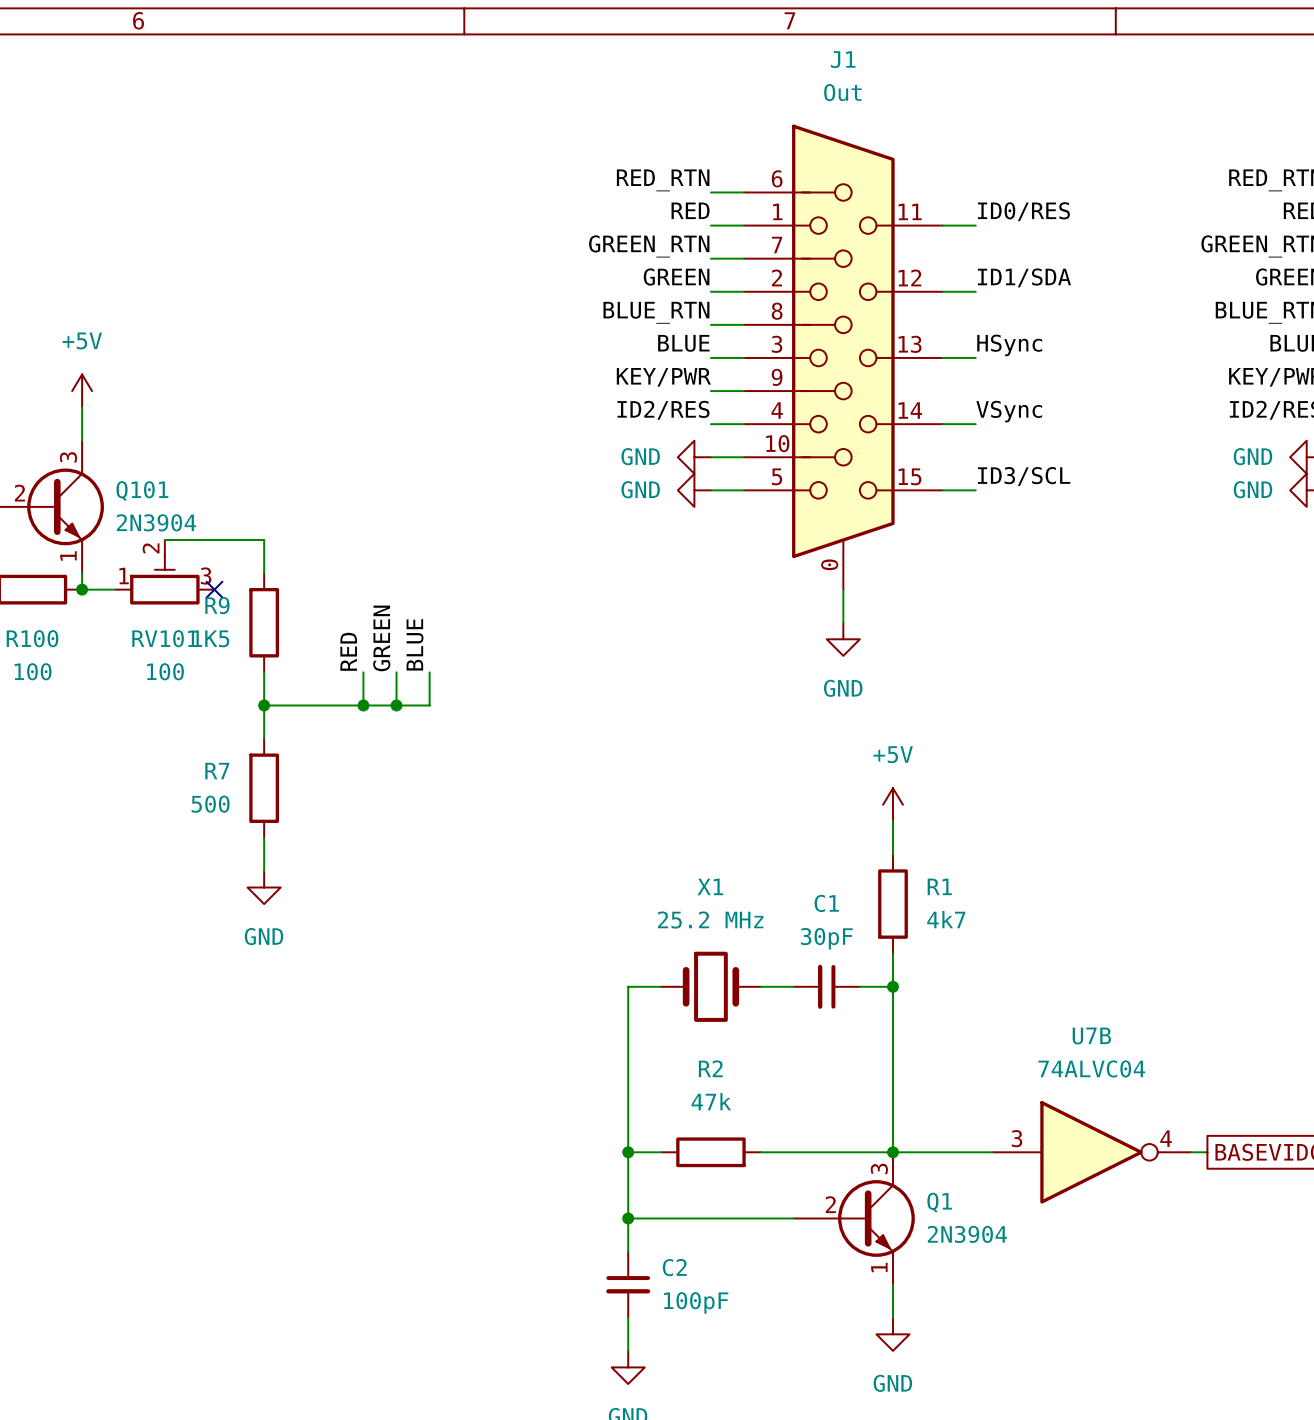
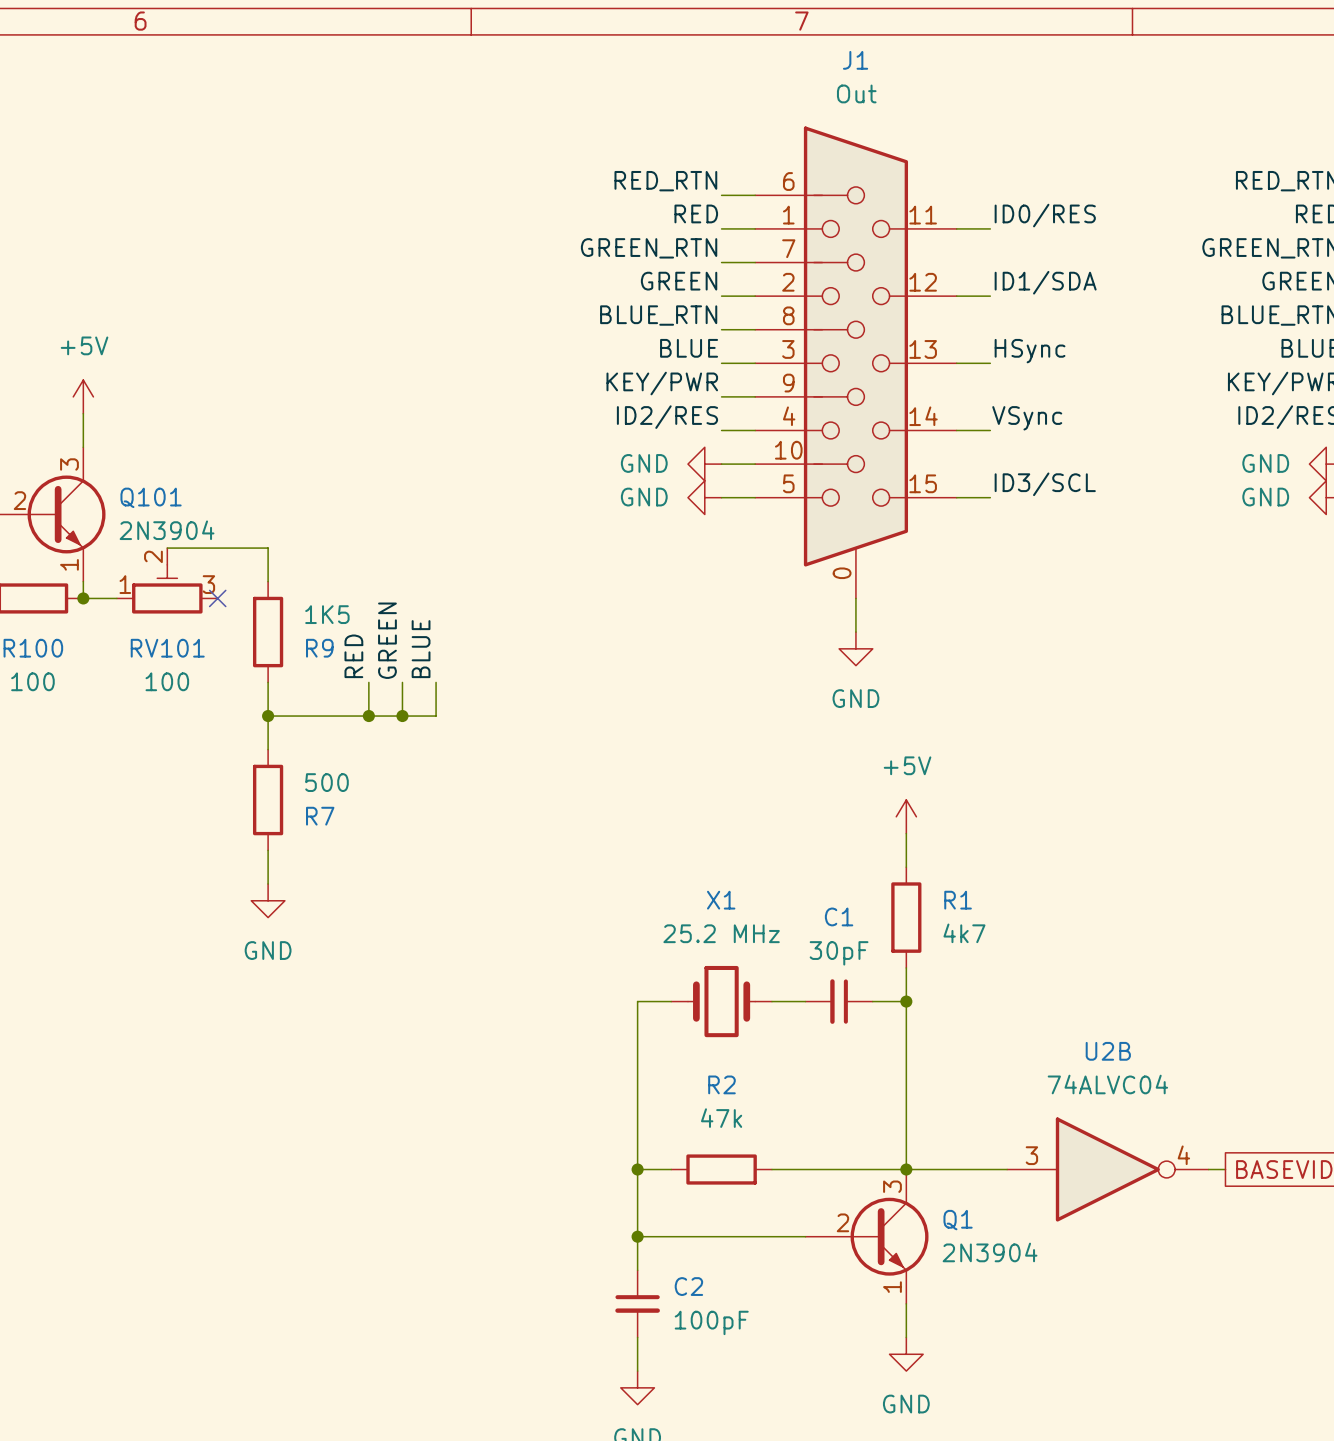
R9 name position: R9 (217, 605) -> R9 (319, 648)
R9 value position: 1K5 (211, 638) -> 1K5 (327, 614)
R7 name position: R7 (217, 771) -> R7 (320, 816)
R7 value position: 500 (210, 804) -> 500 (327, 782)
U7B name: U7B (1091, 1036) -> U2B (1108, 1051)

